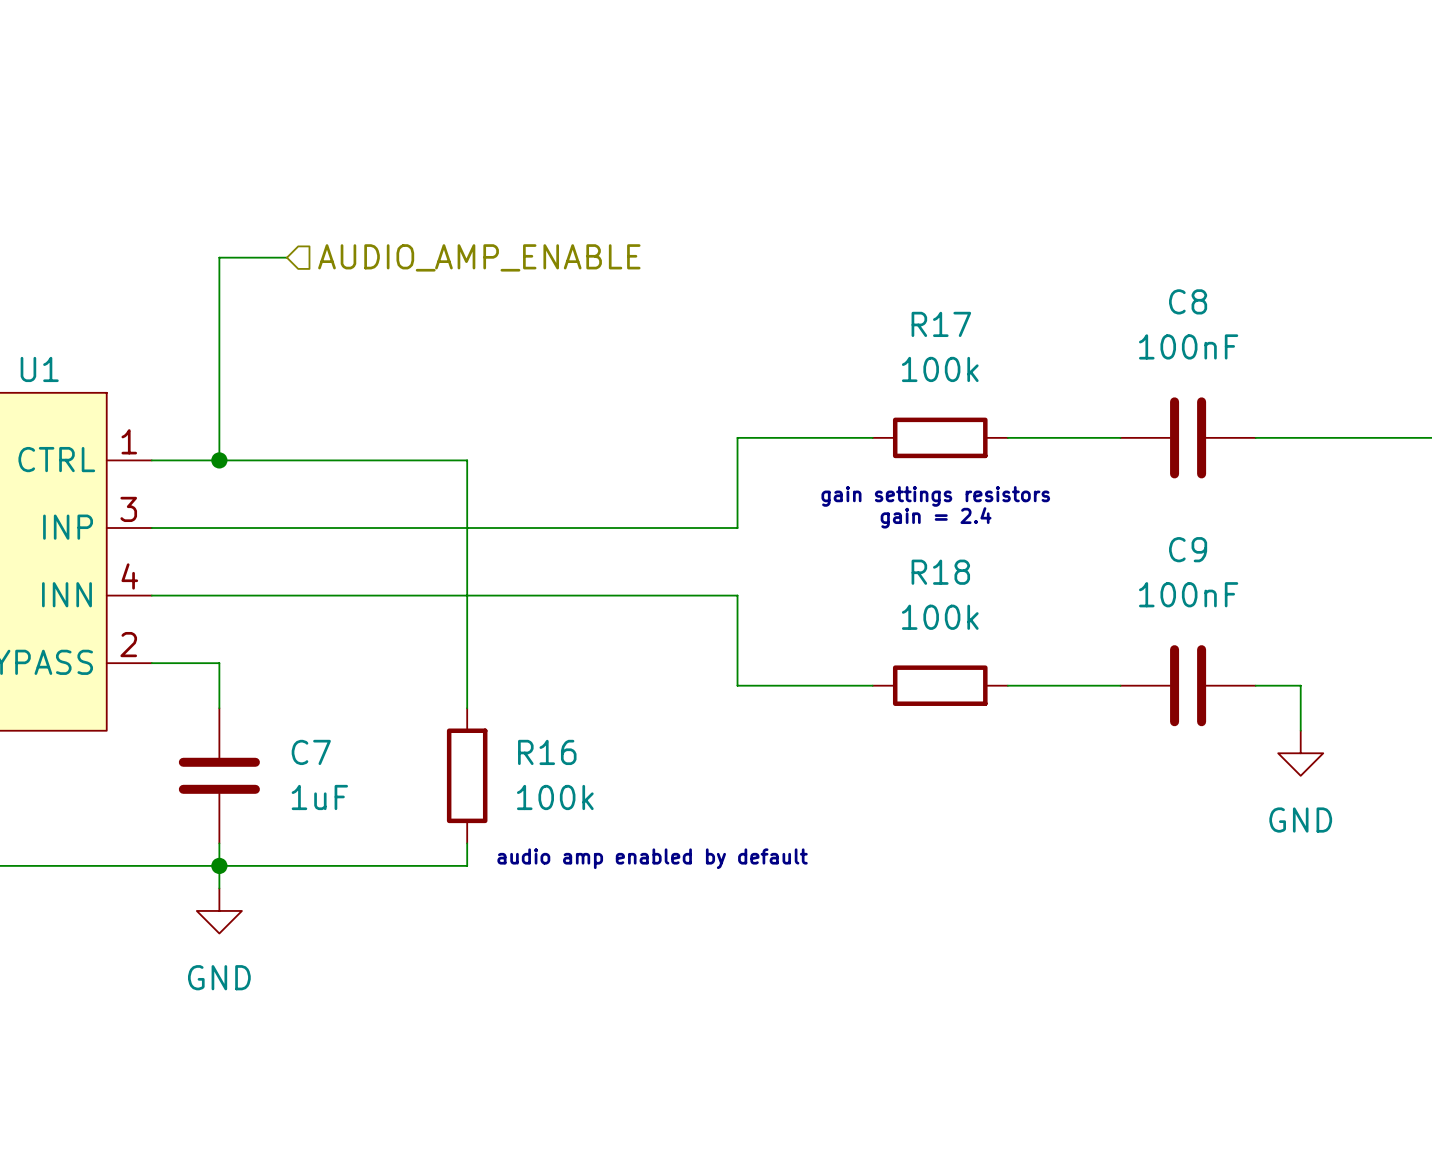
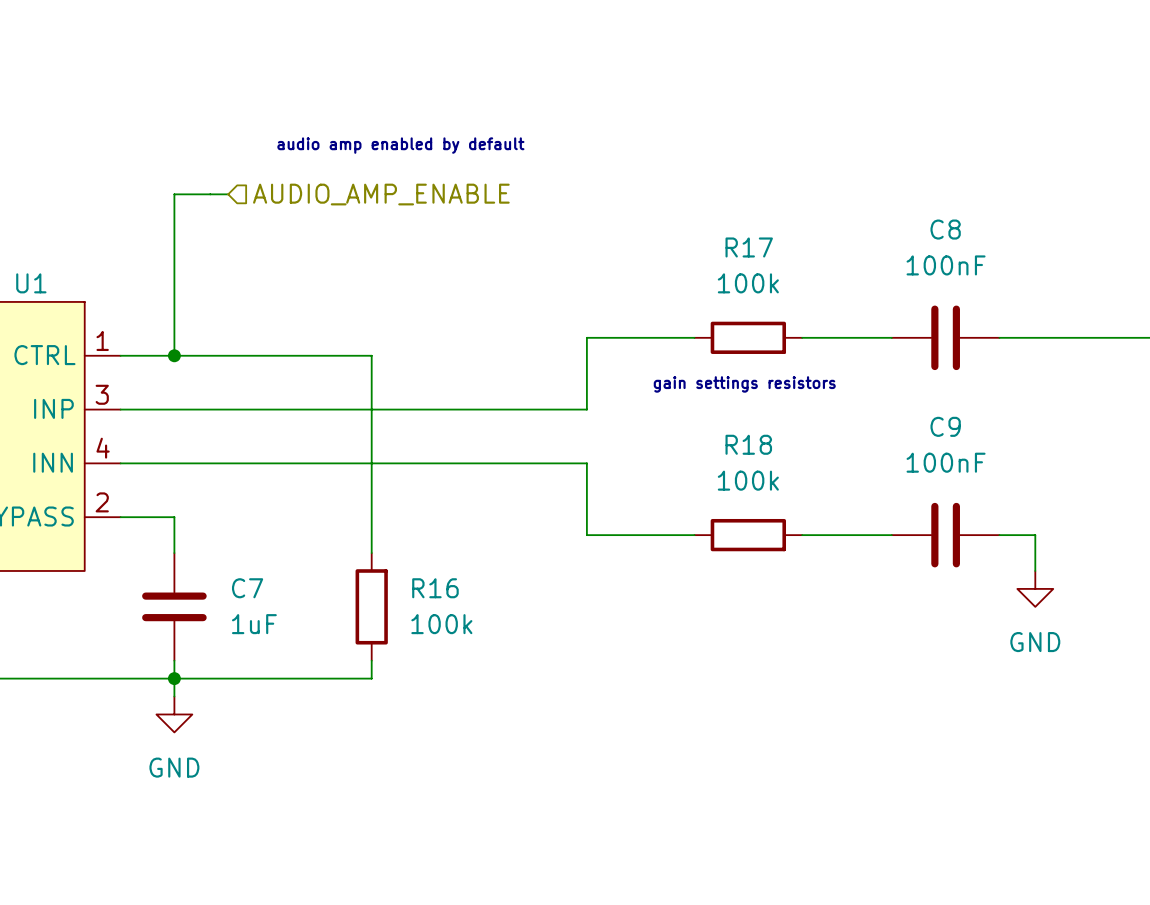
text: none -> audio amp enabled by default (400, 145)
text: gain = 2.4 (936, 517) -> none
text: audio amp enabled by default (652, 858) -> none

